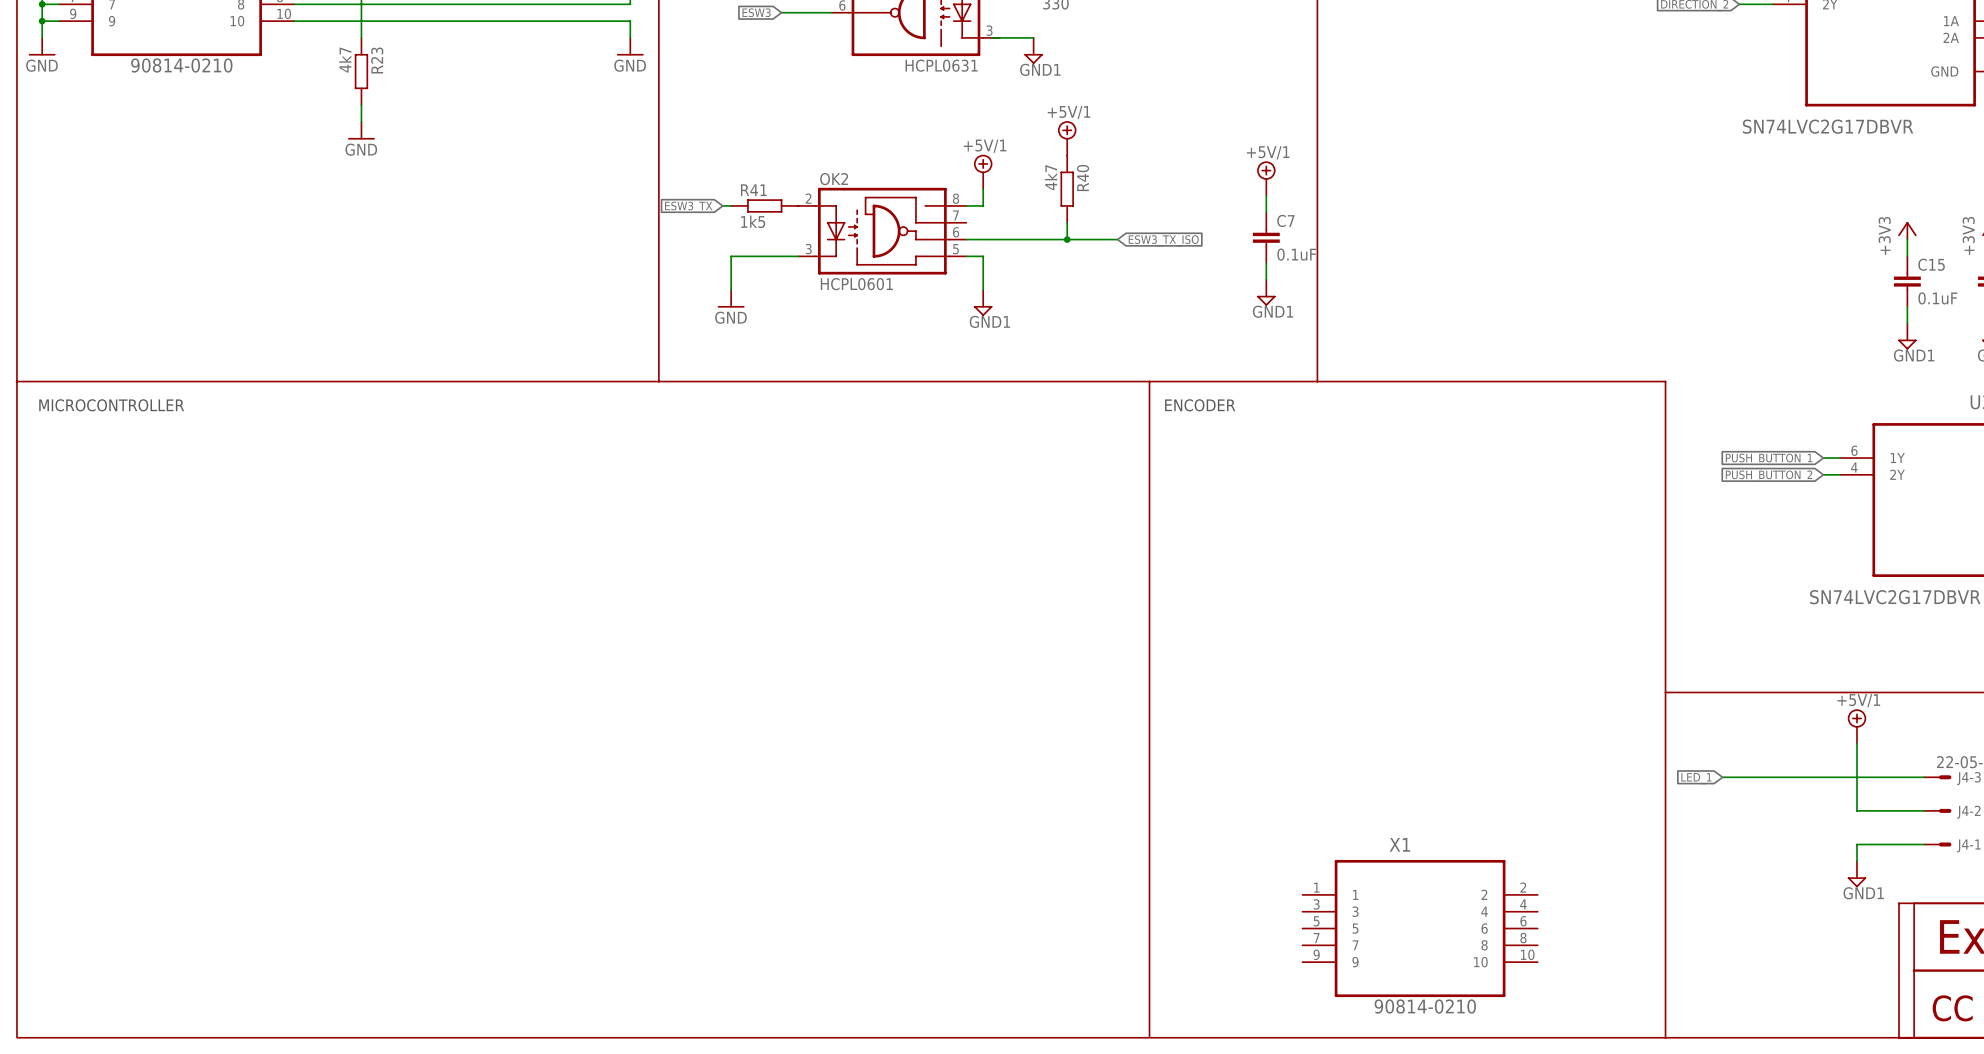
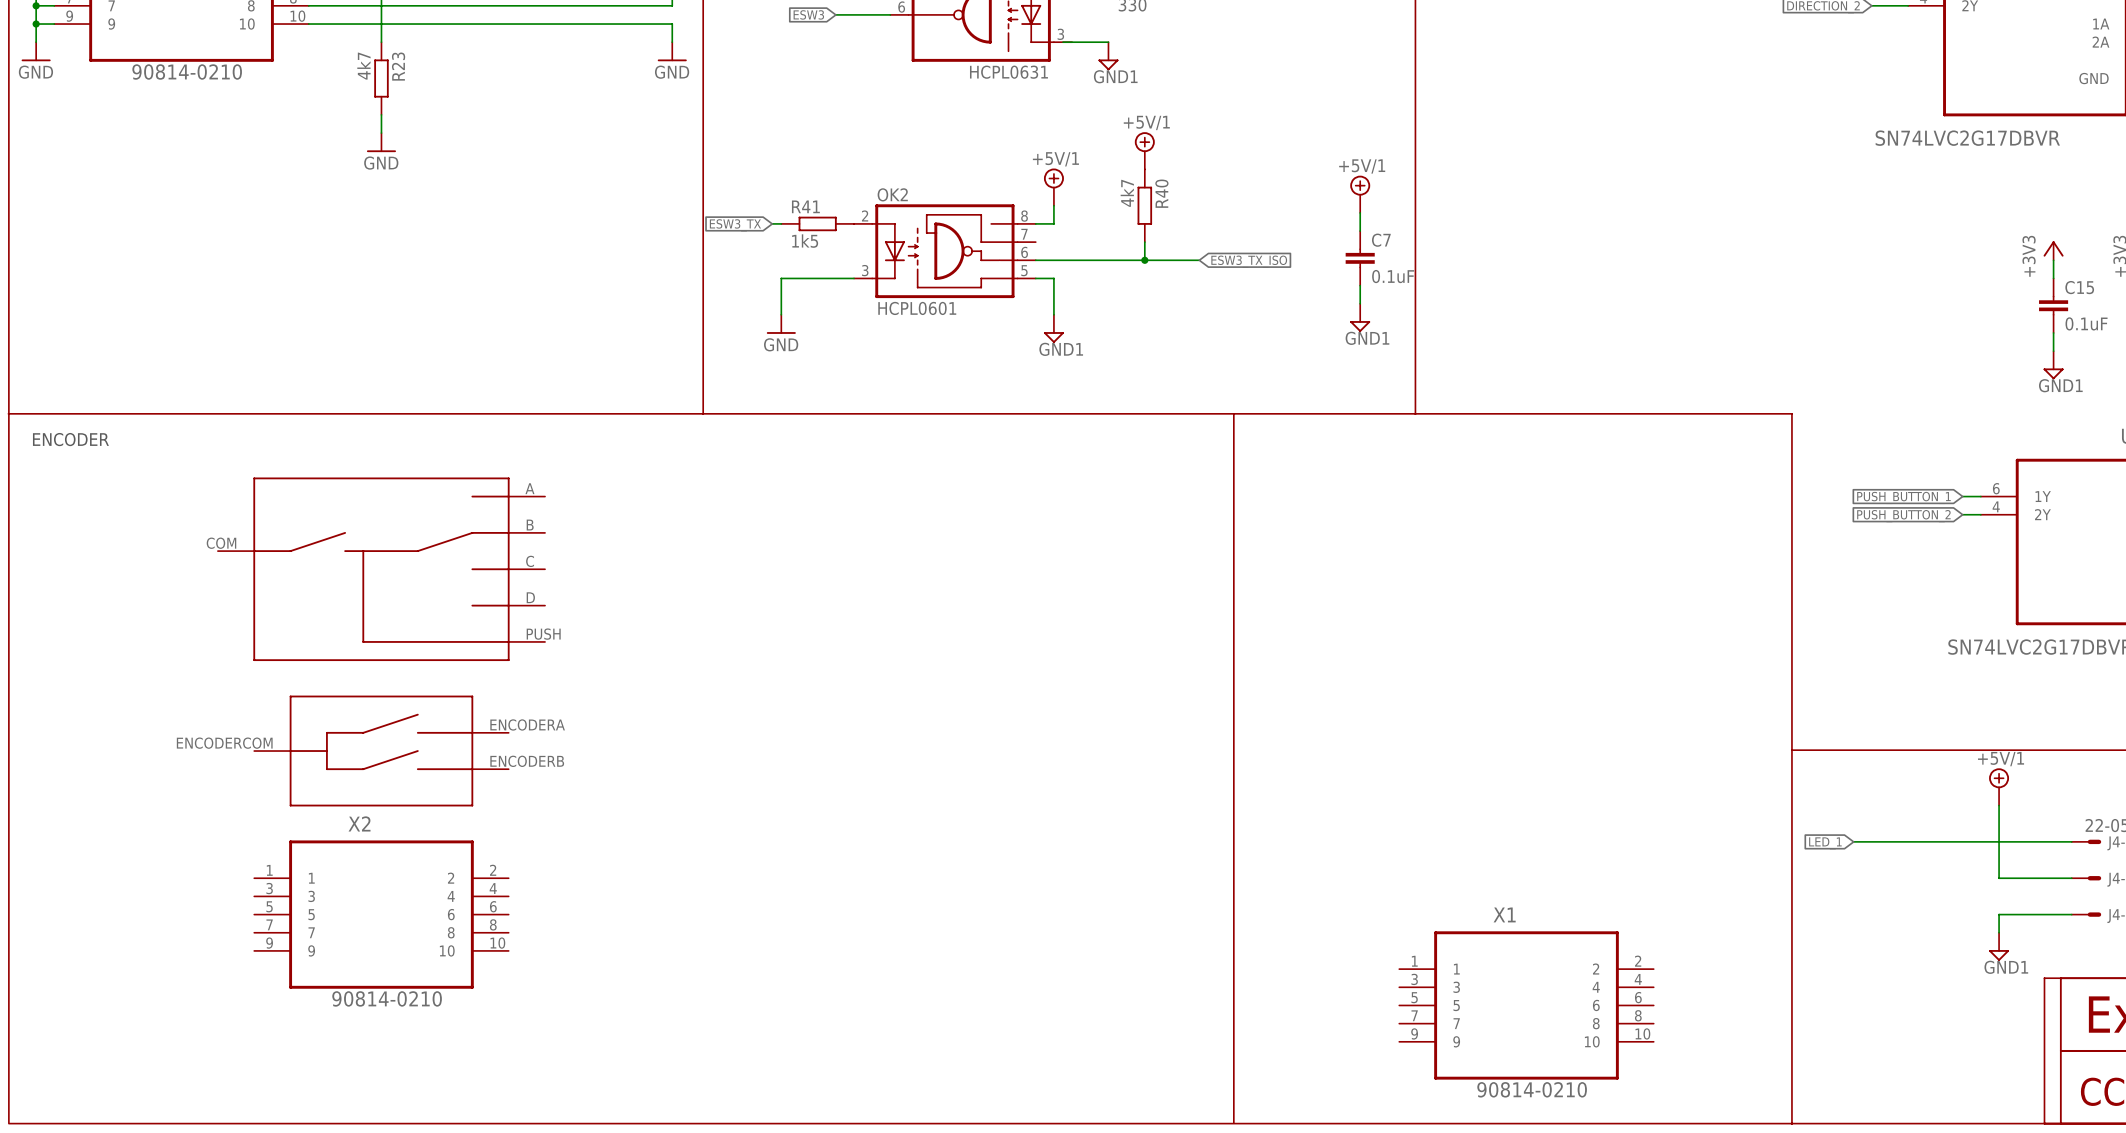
text: MICROCONTROLLER (111, 405) -> ENCODER (70, 439)
text: ENCODER (1200, 405) -> none
part: none -> (381, 569)
part: none -> (381, 751)
X2: none -> 90814-0210 (381, 914)

